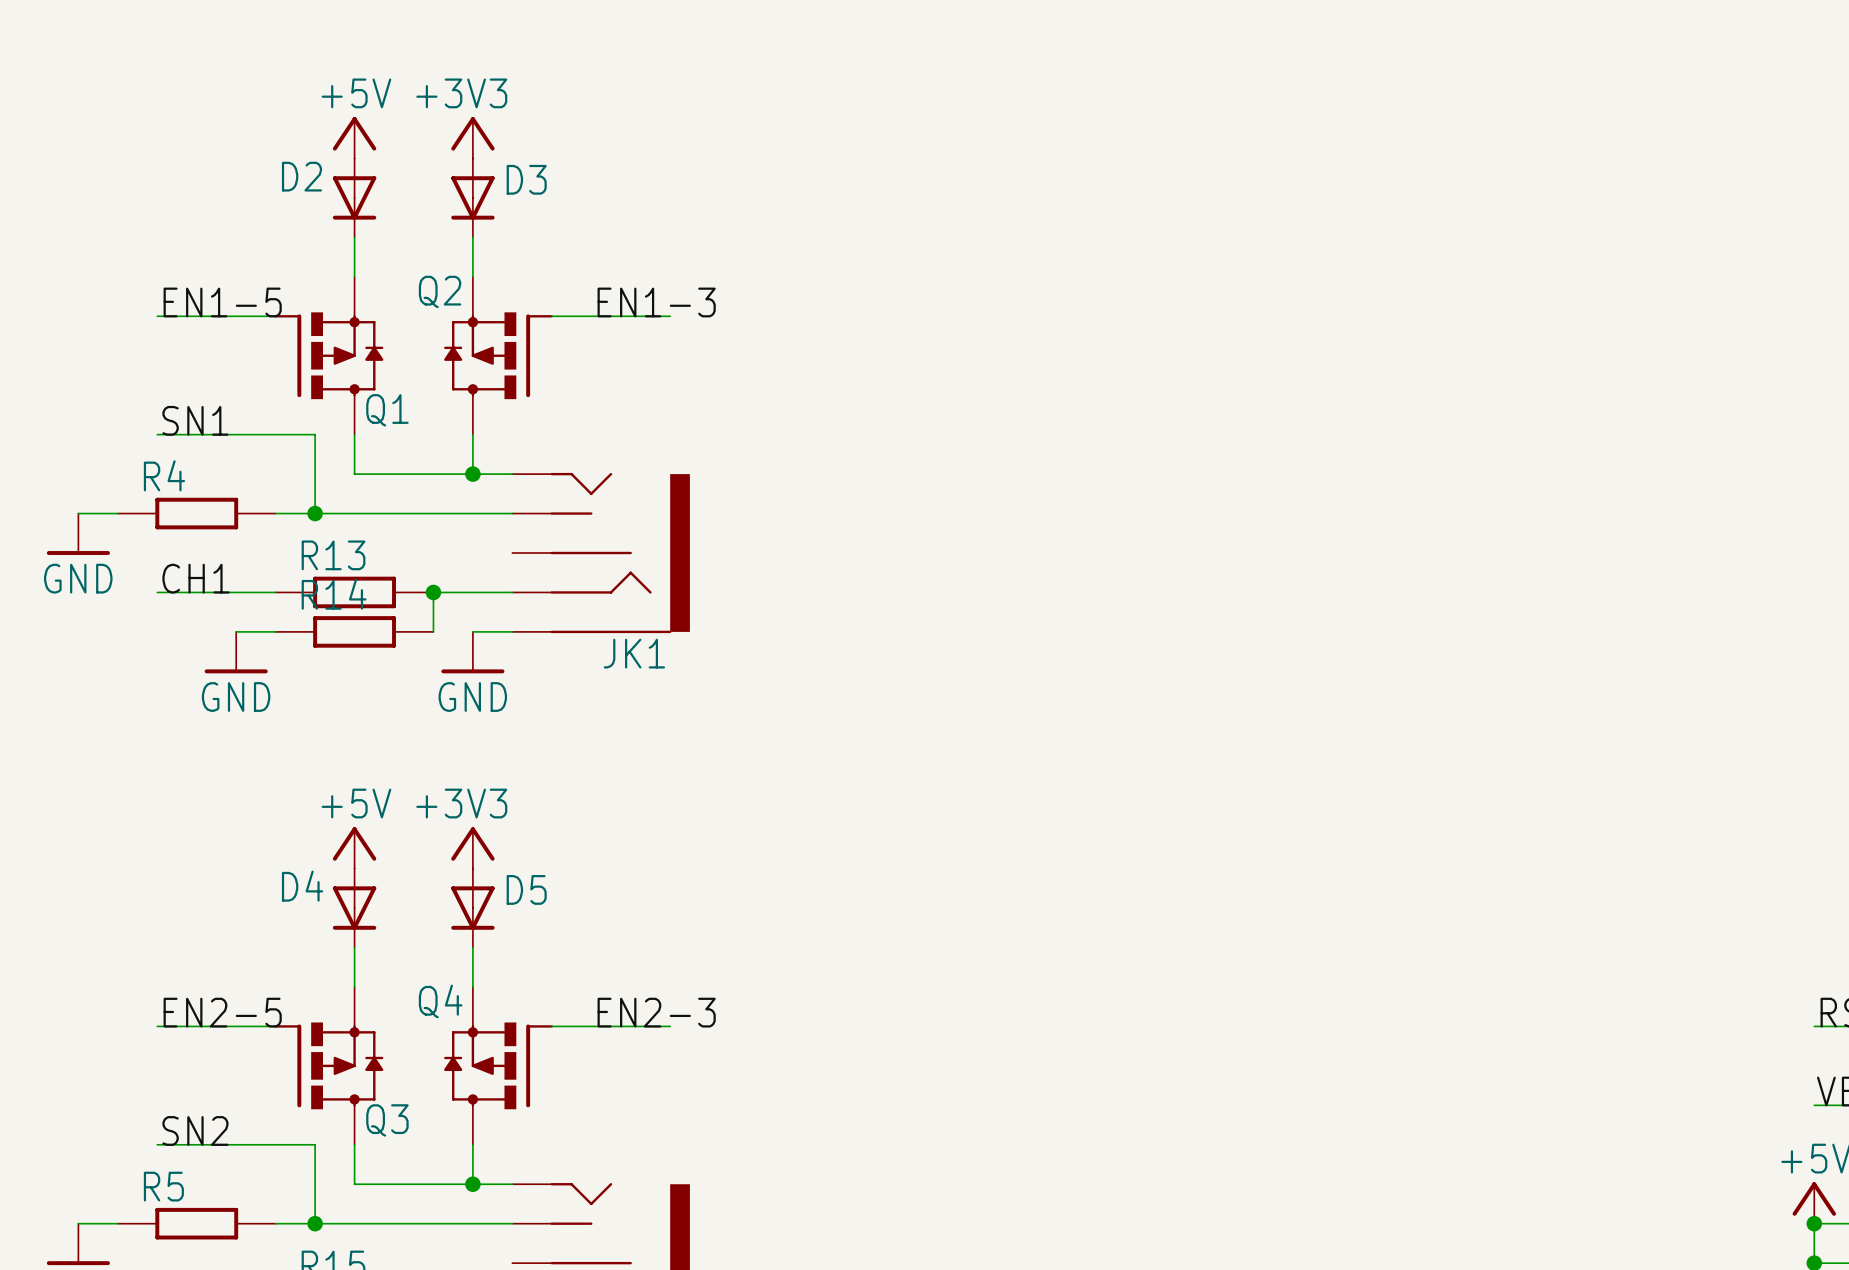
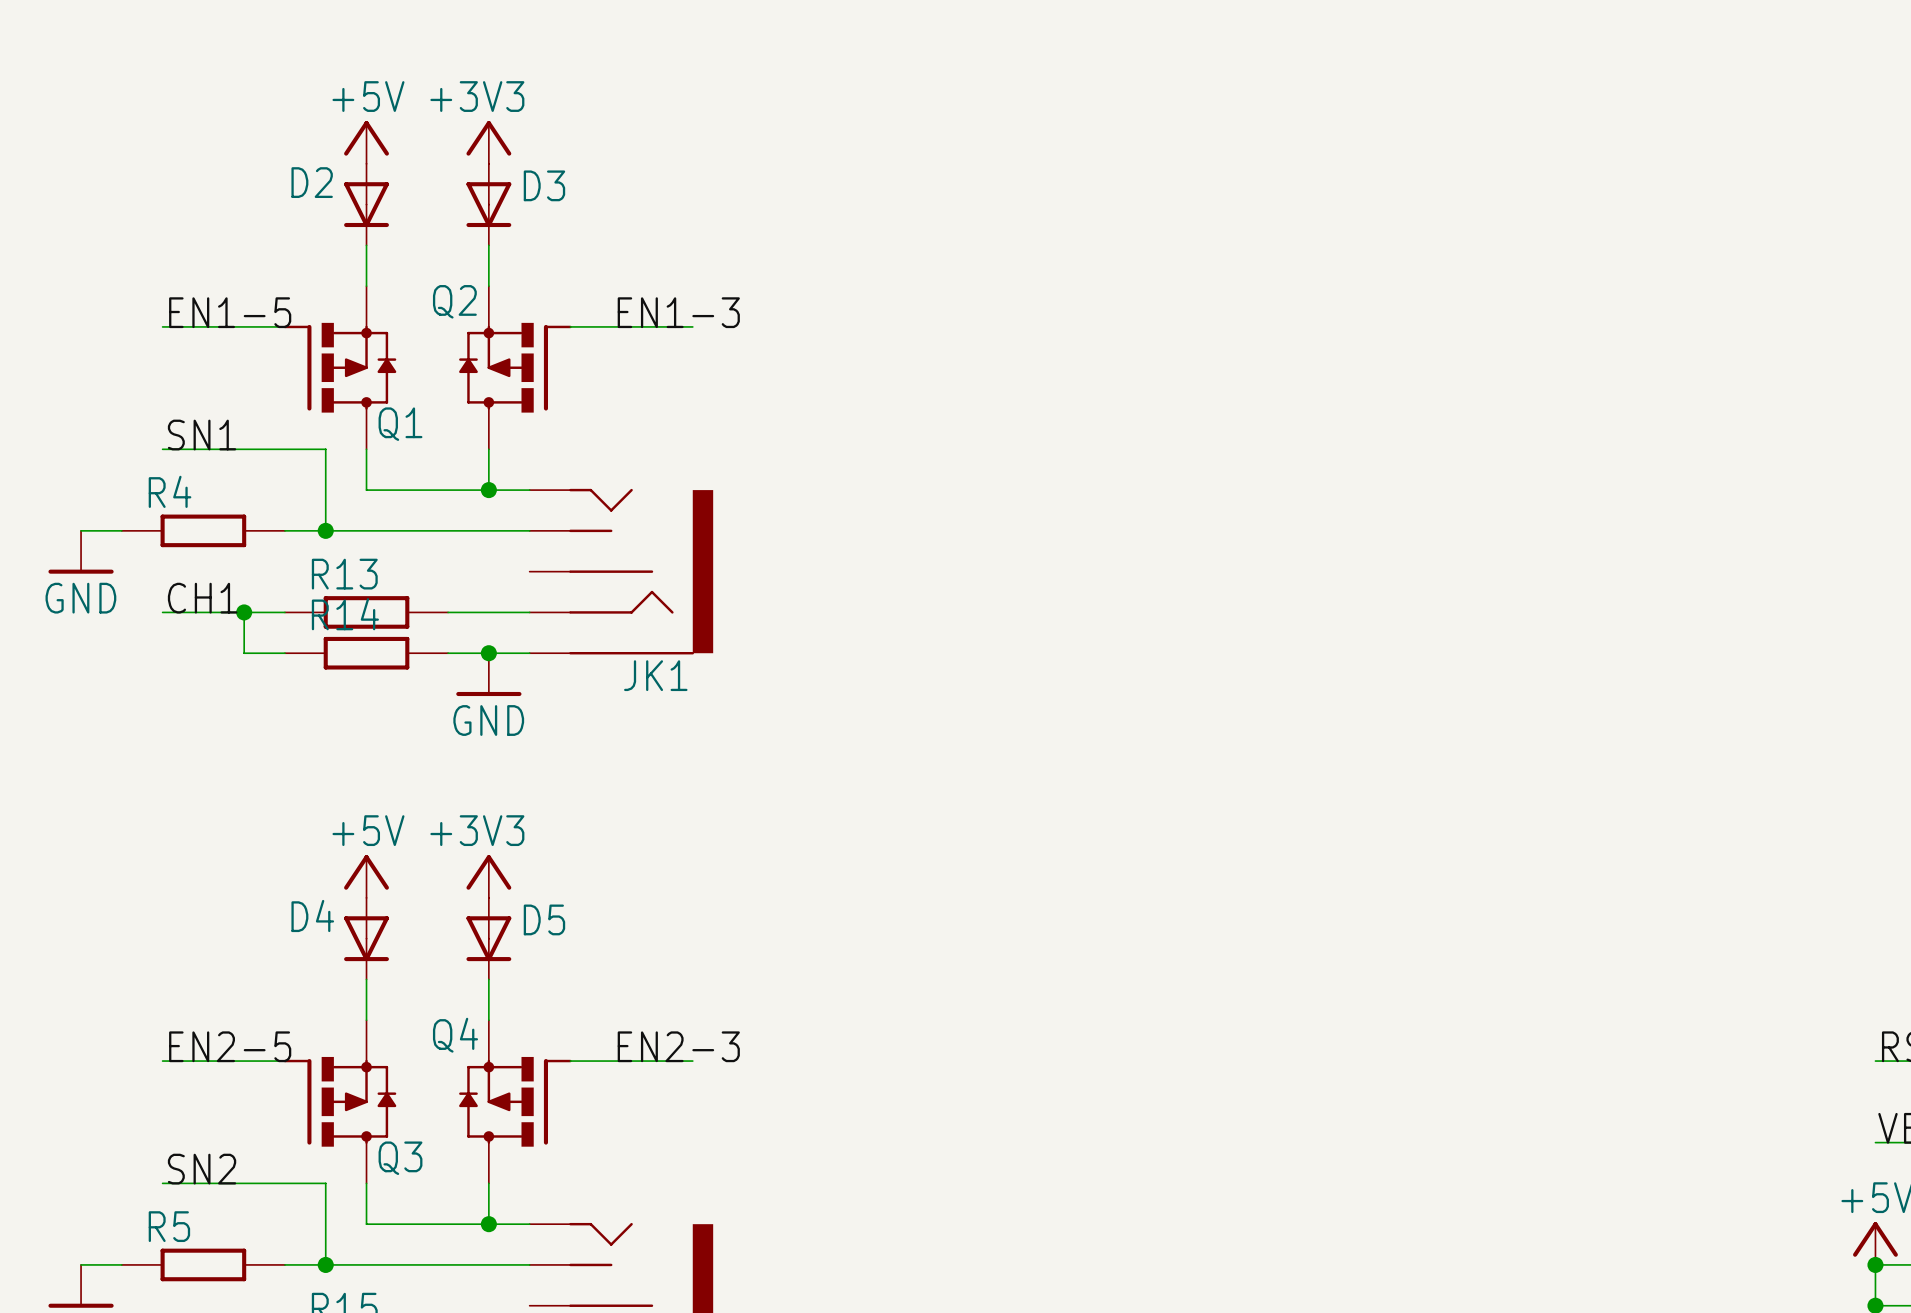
wire: none -> (244, 612) (244, 653)
junction: none -> (244, 612)
wire: (433, 592) (433, 631) -> (488, 653) (448, 653)
junction position: (433, 592) -> (488, 653)
power symbol: GND (236, 652) -> none

